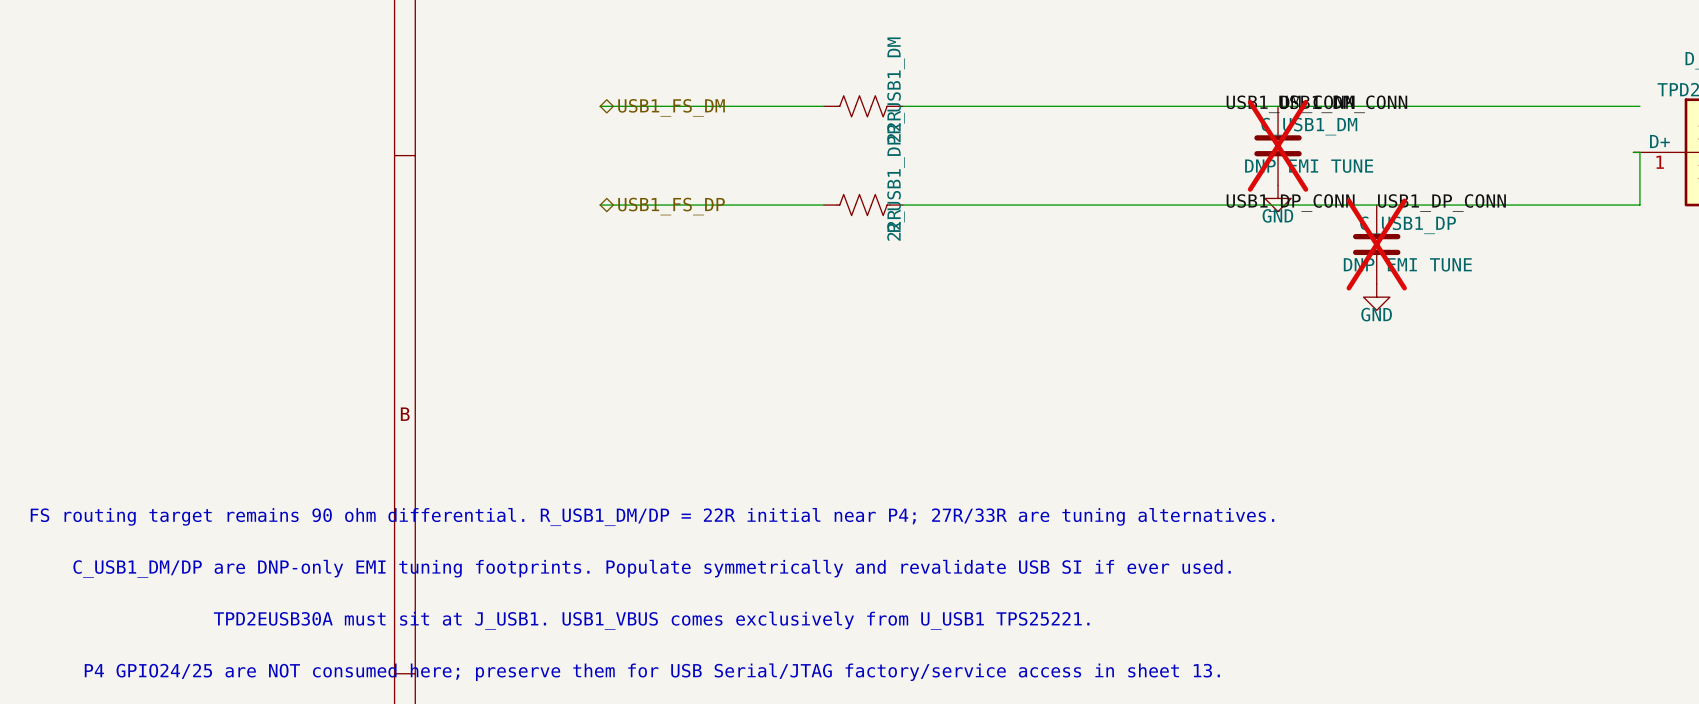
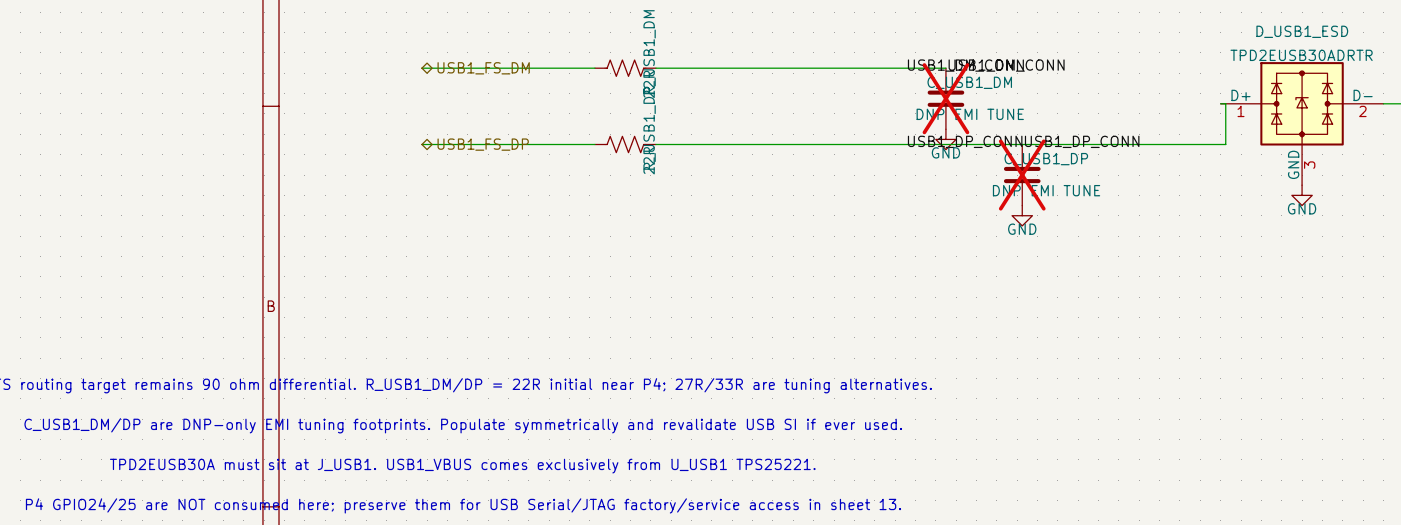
wire: (1278, 106) (1639, 106) -> none

